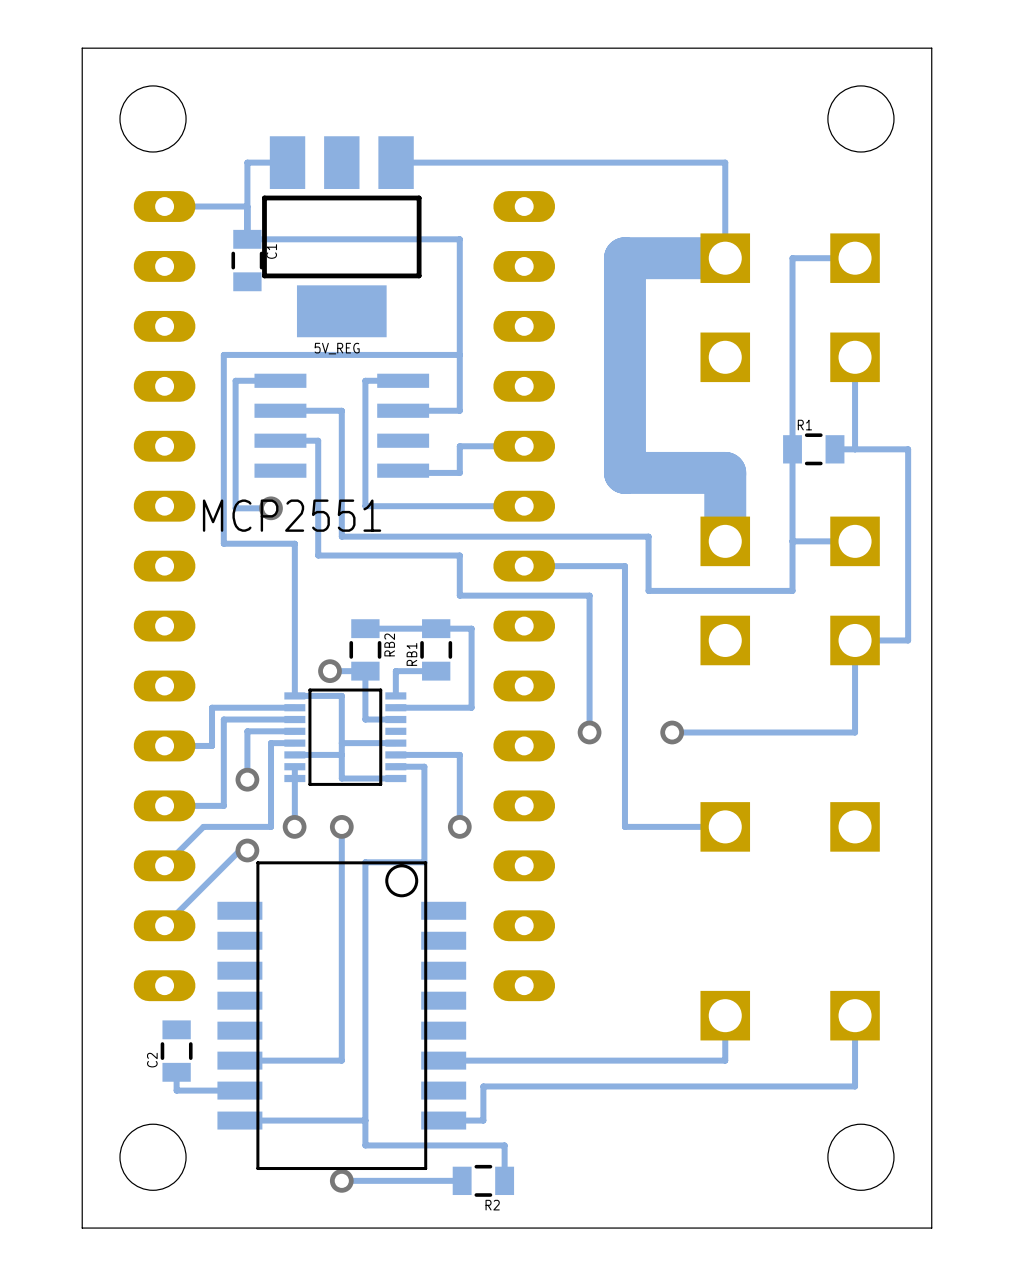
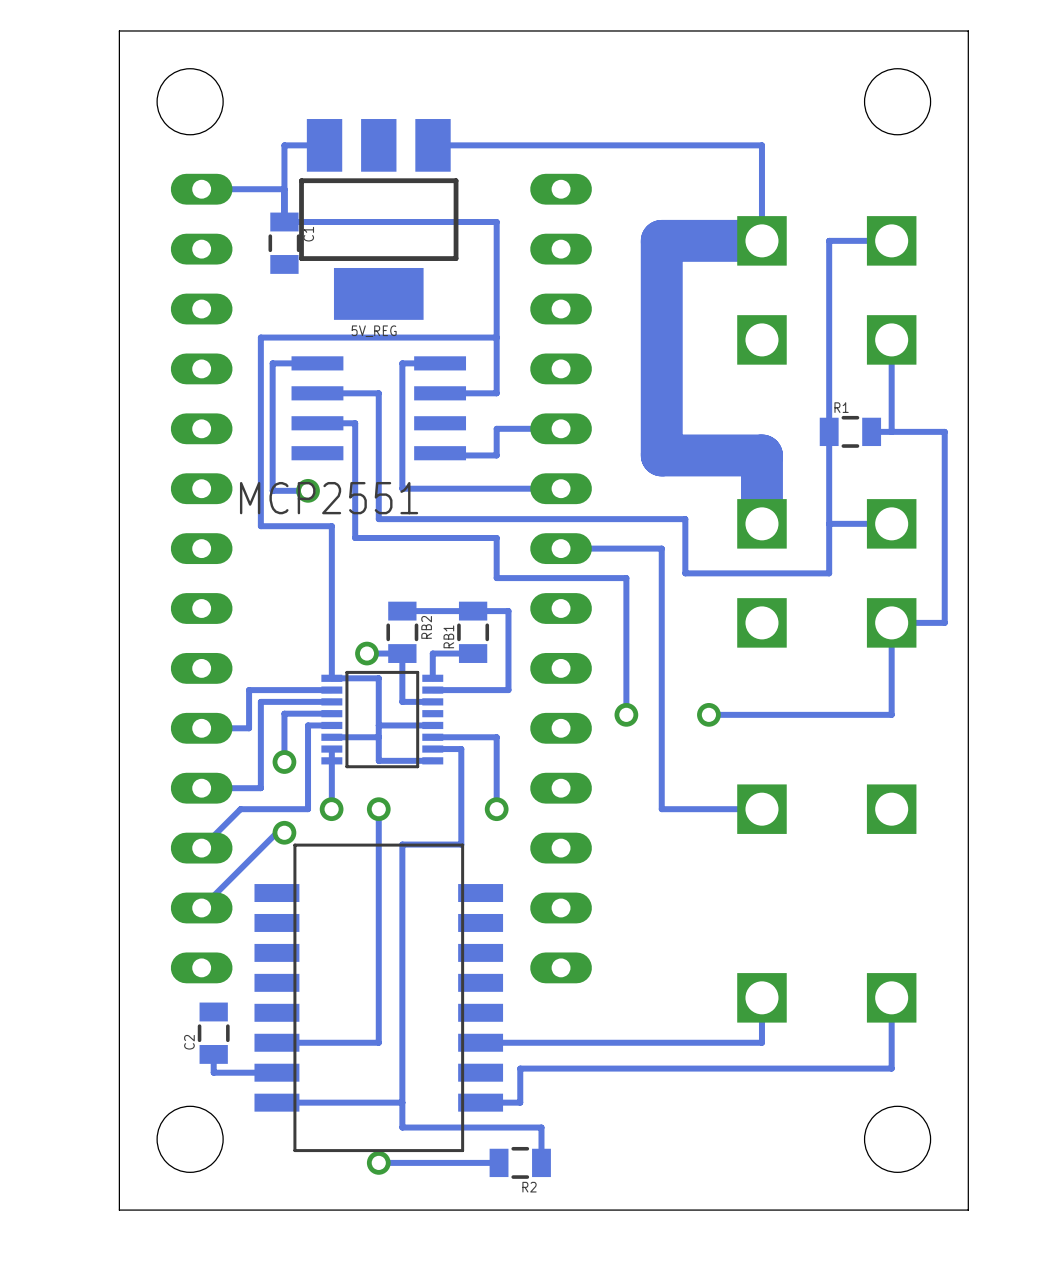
part footprint: [217, 861, 467, 1171] -> [254, 843, 504, 1153]

